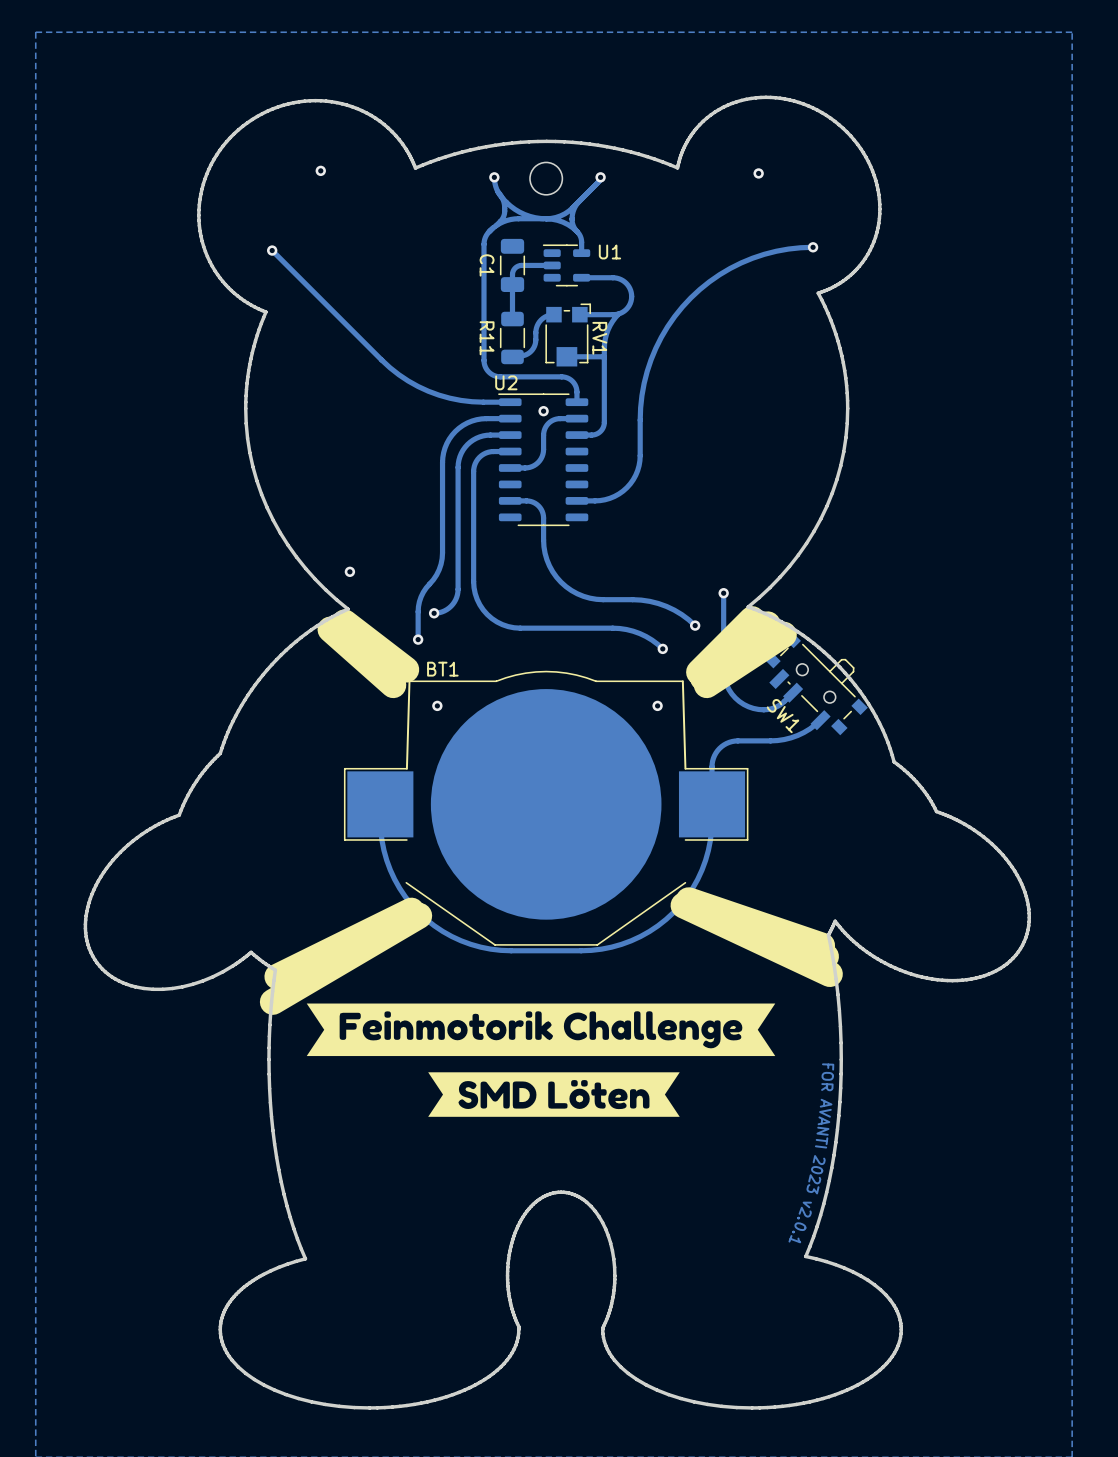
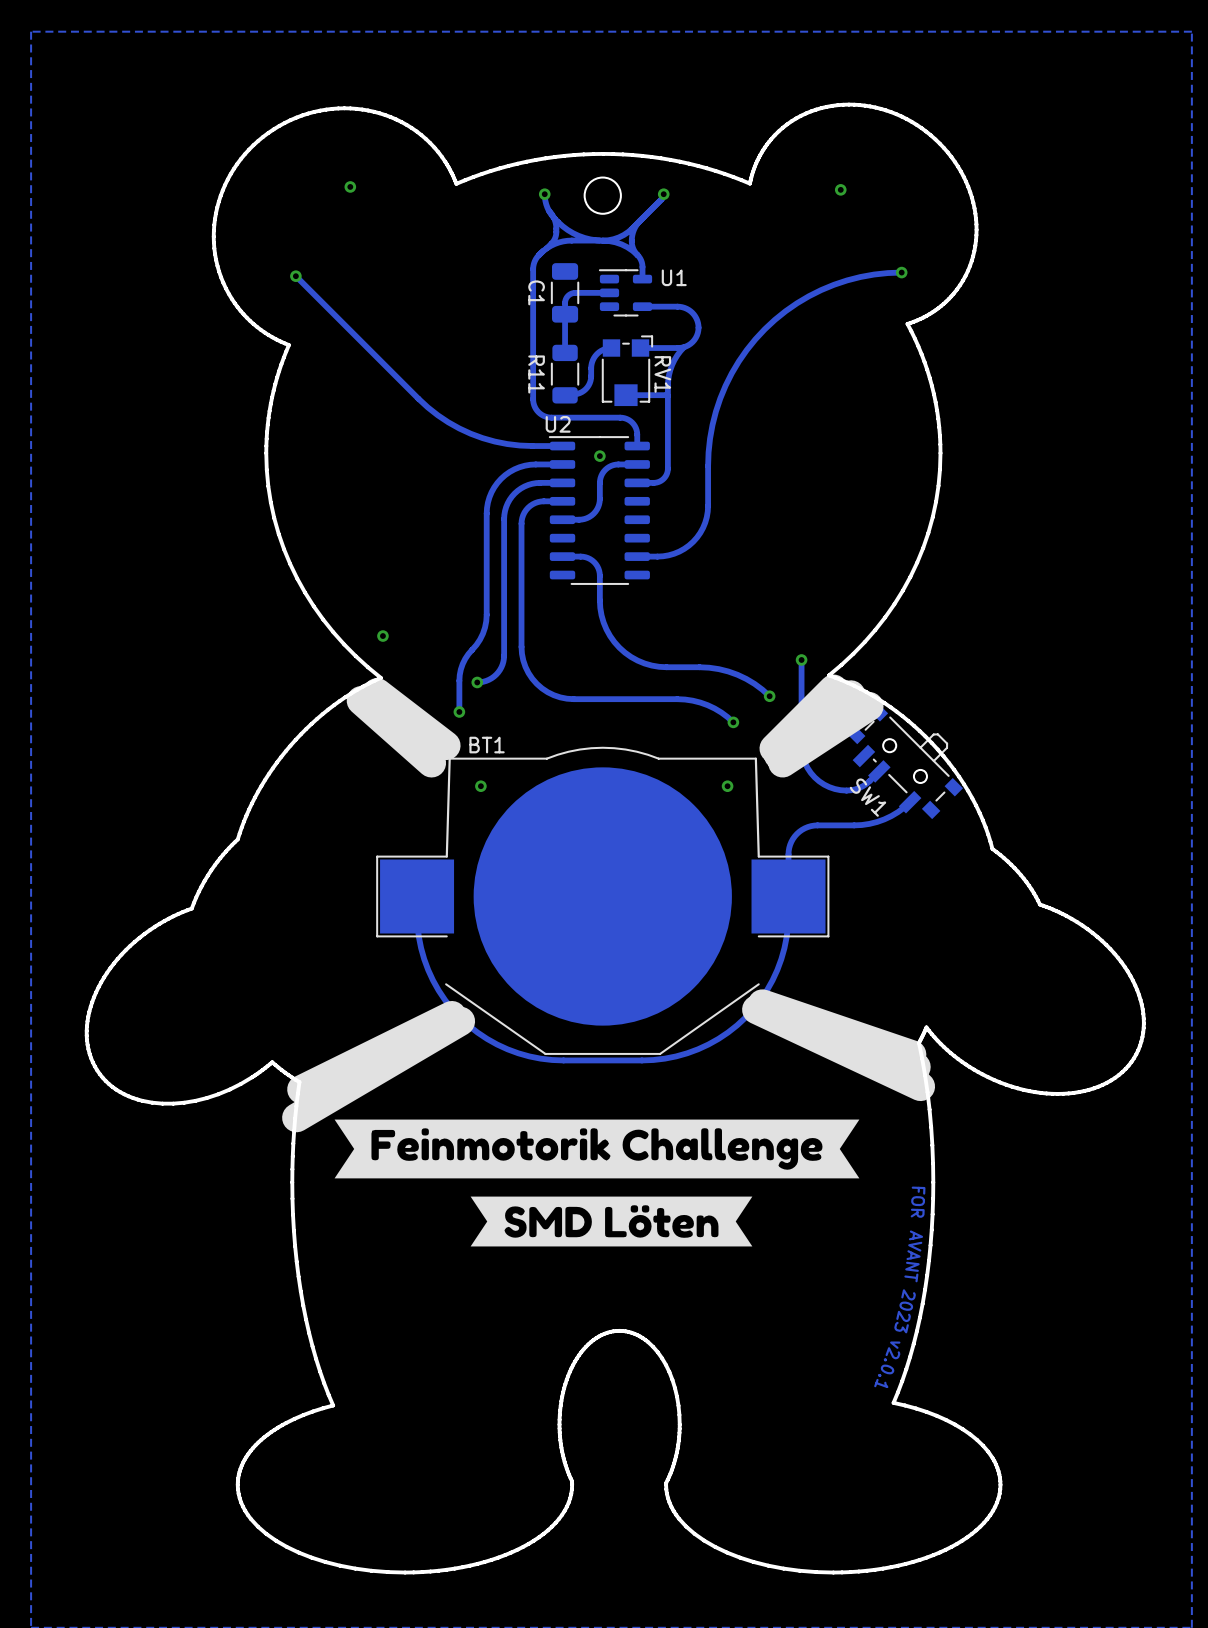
text: AVANTI (823, 1123) -> AVANT (913, 1256)

